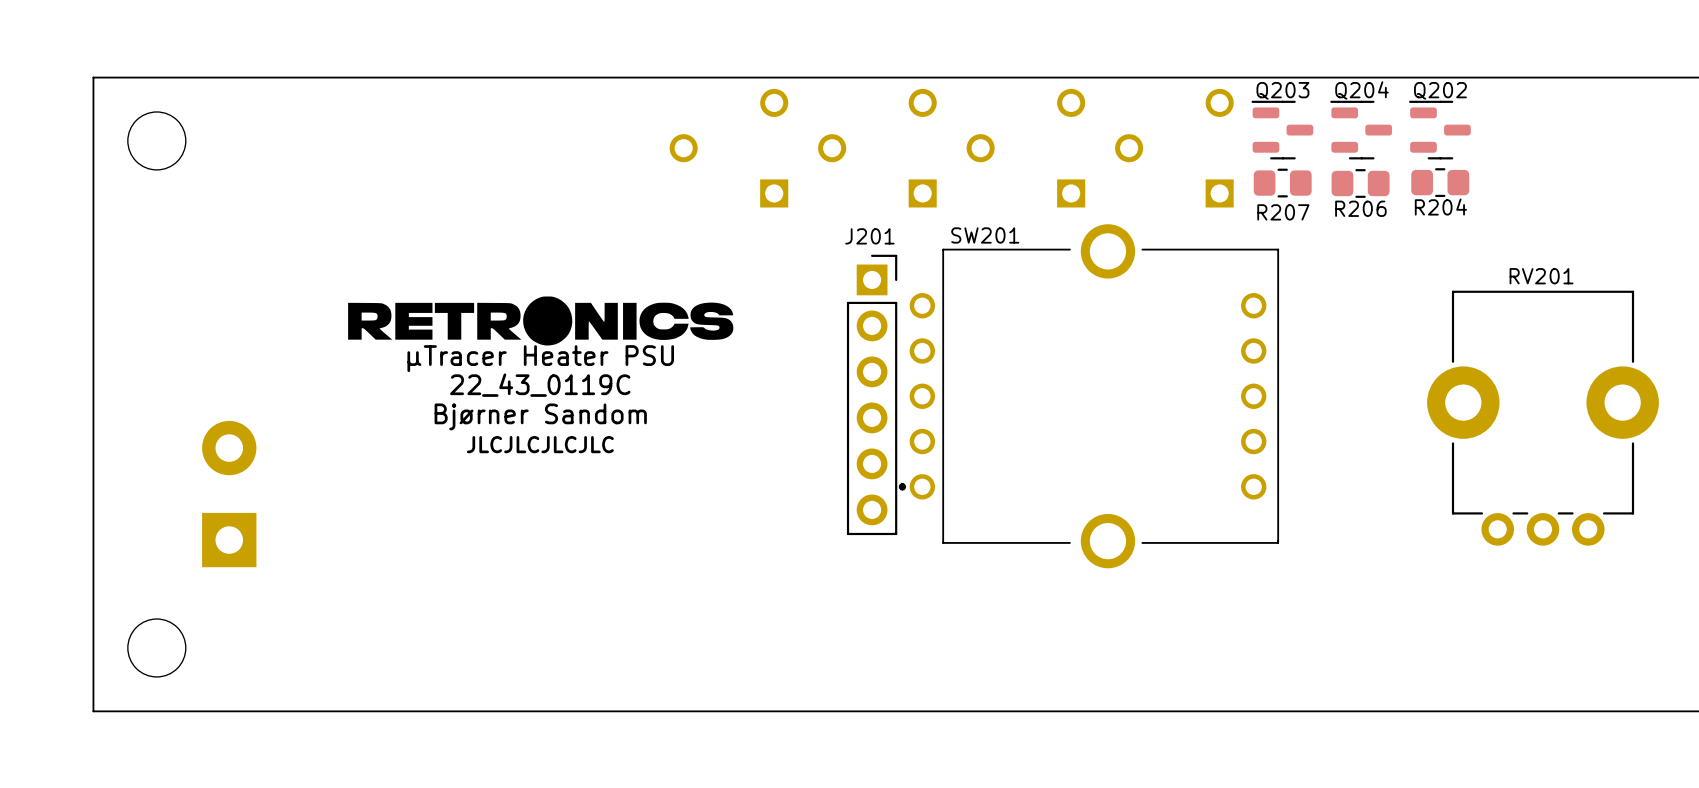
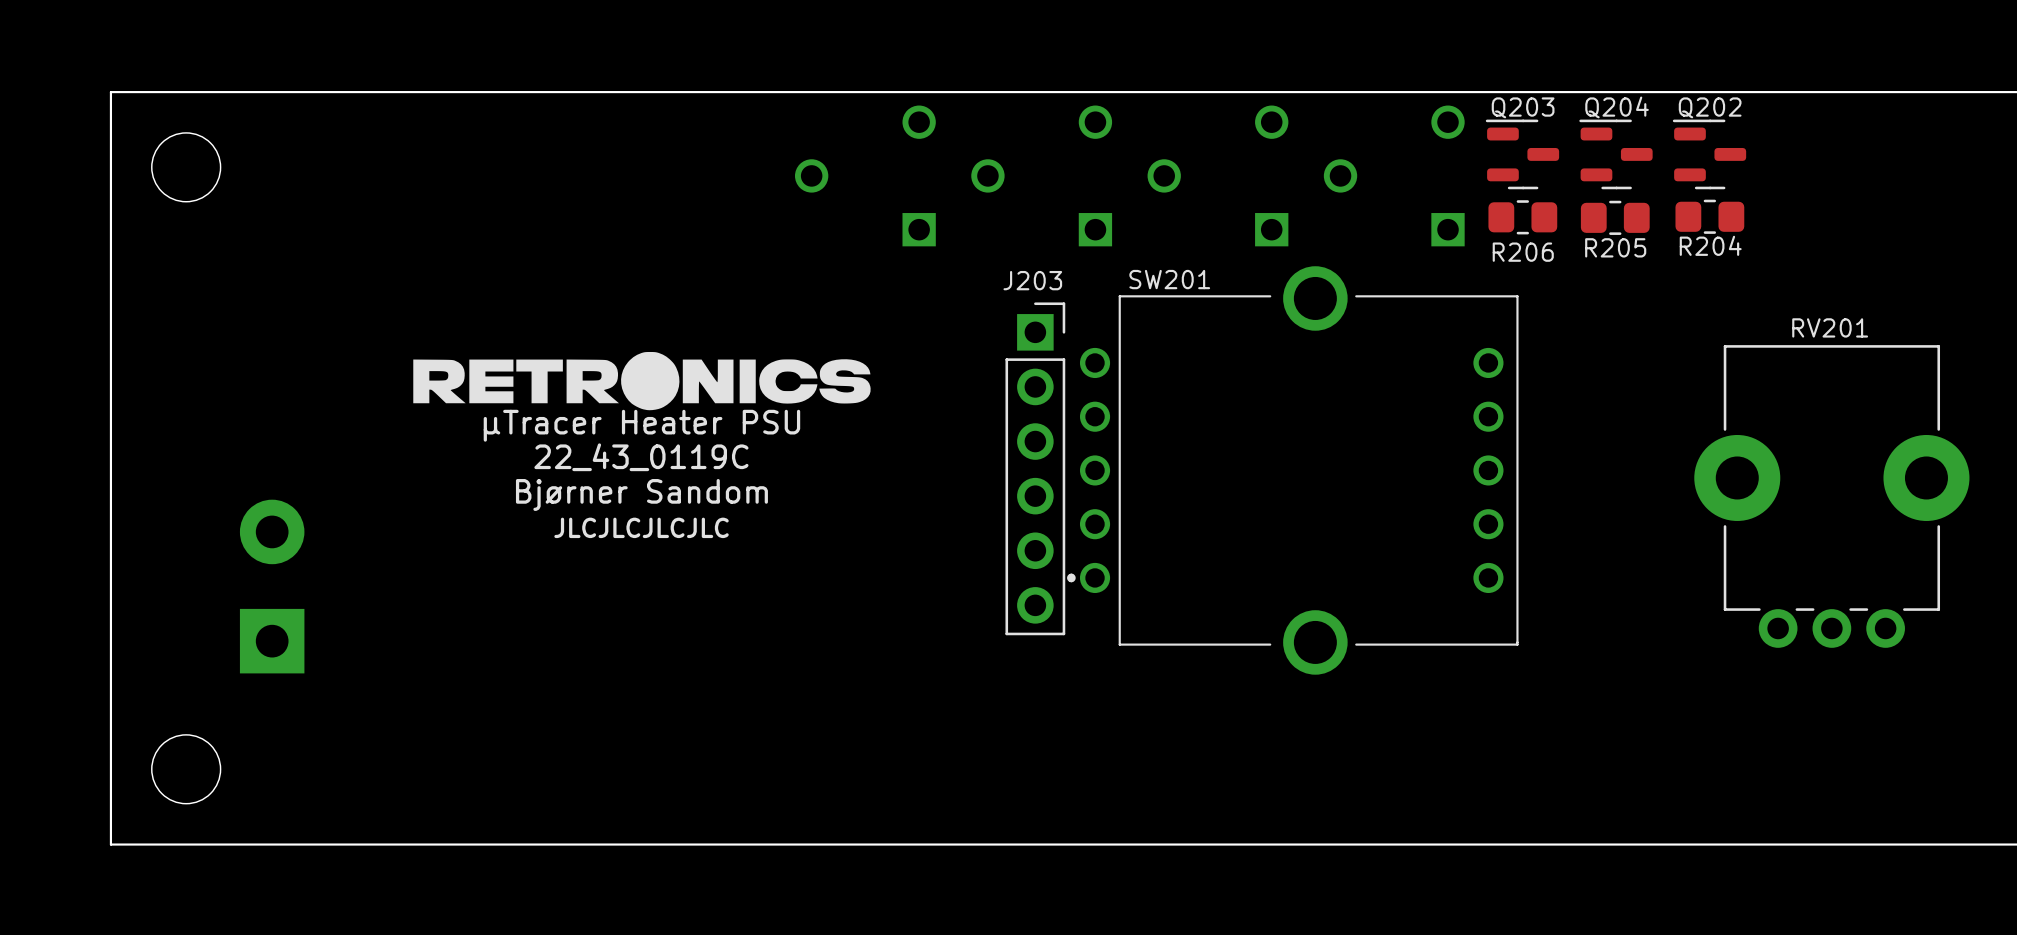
R206 name: R206 (1360, 208) -> R205 (1615, 247)
R207 name: R207 (1283, 212) -> R206 (1523, 252)
J201 name: J201 (869, 236) -> J203 (1032, 280)

